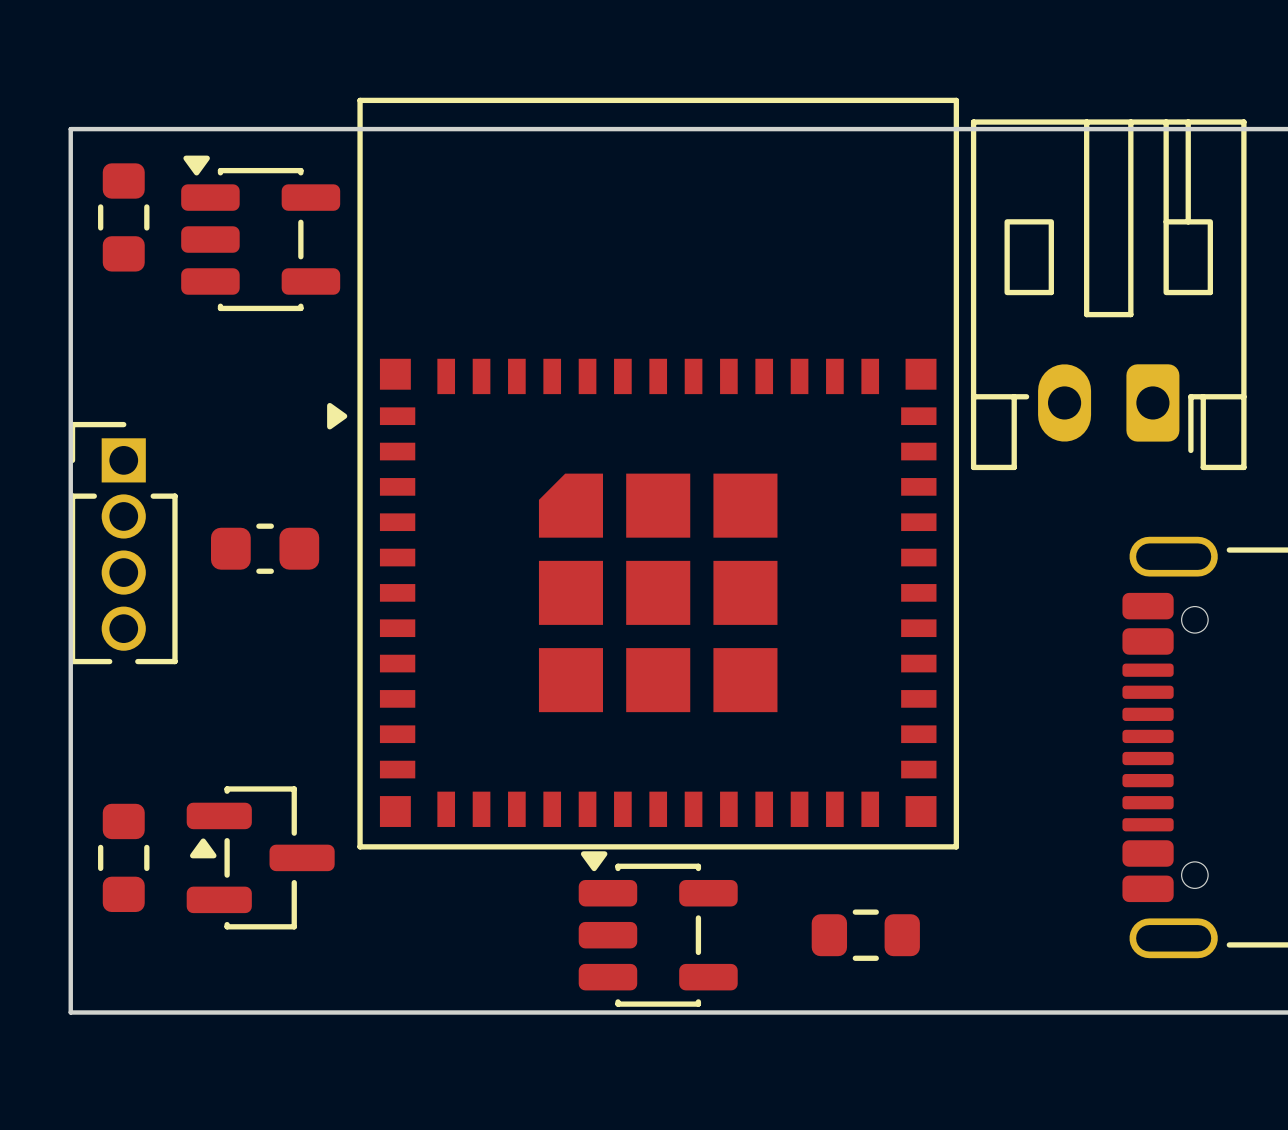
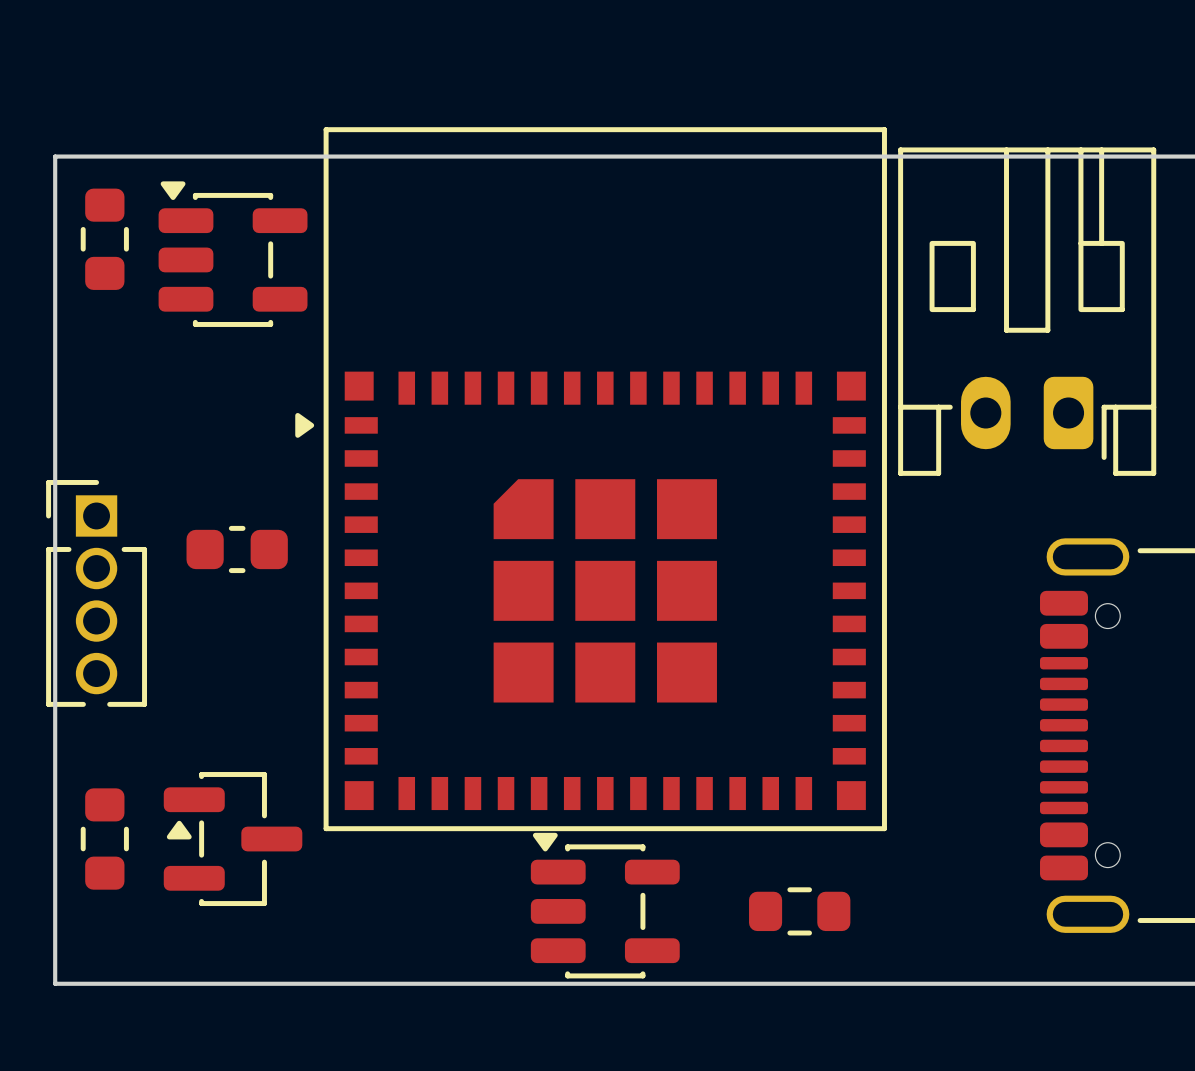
part position: (123, 543) -> (96, 593)

